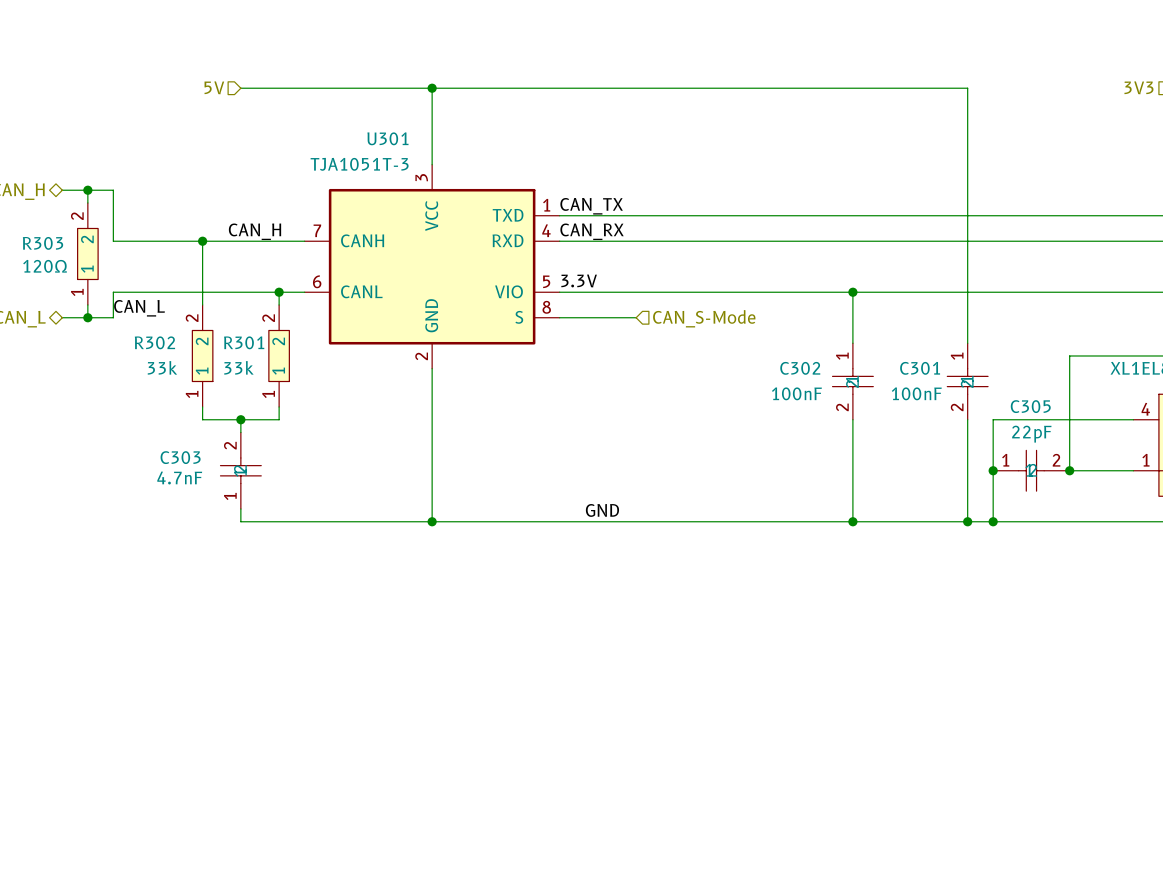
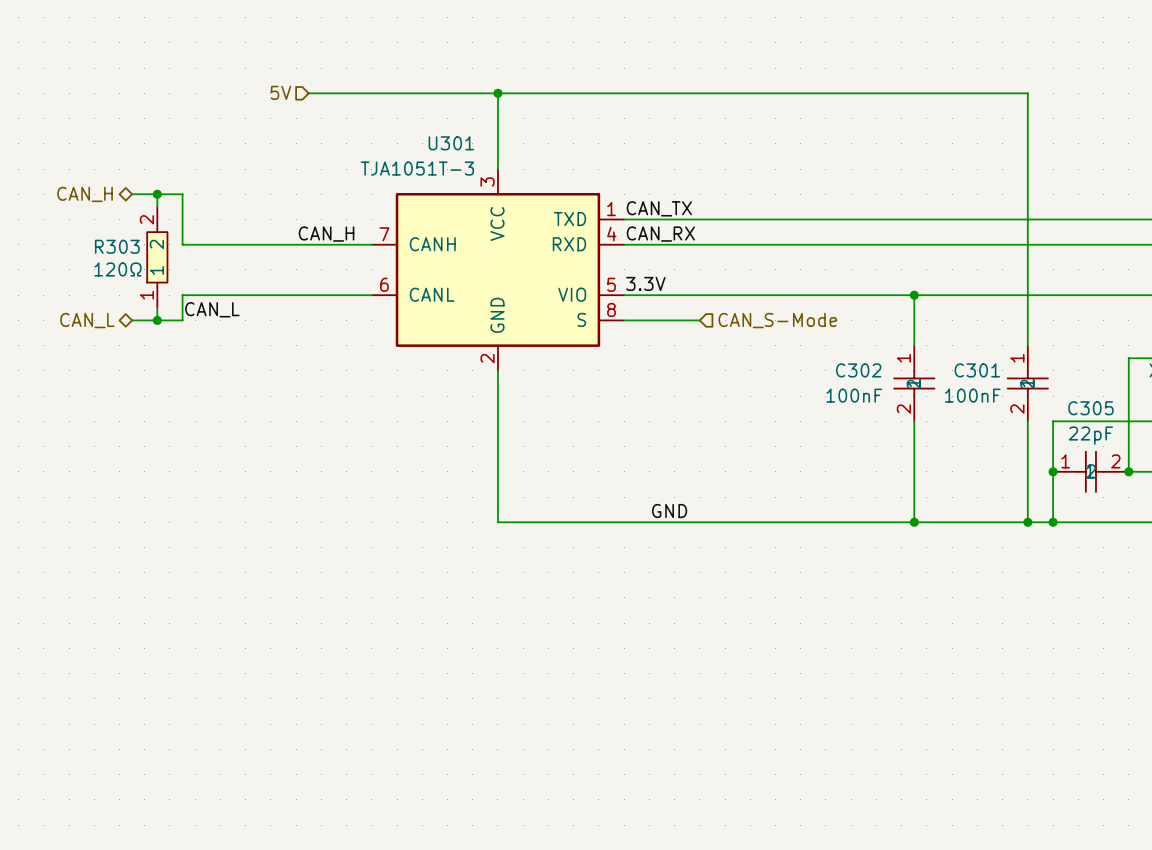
wire: (202, 241) (202, 304) -> none
junction: (202, 241) -> none
wire: (279, 292) (279, 304) -> none
junction: (279, 292) -> none
R302: 33k (202, 355) -> none
R301: 33k (279, 355) -> none
wire: (202, 407) (202, 419) (279, 419) (279, 407) -> none
wire: (240, 419) (240, 432) -> none
junction: (240, 419) -> none
C303: 4.7nF (240, 470) -> none
wire: (240, 509) (240, 521) (432, 521) -> none
junction: (432, 521) -> none

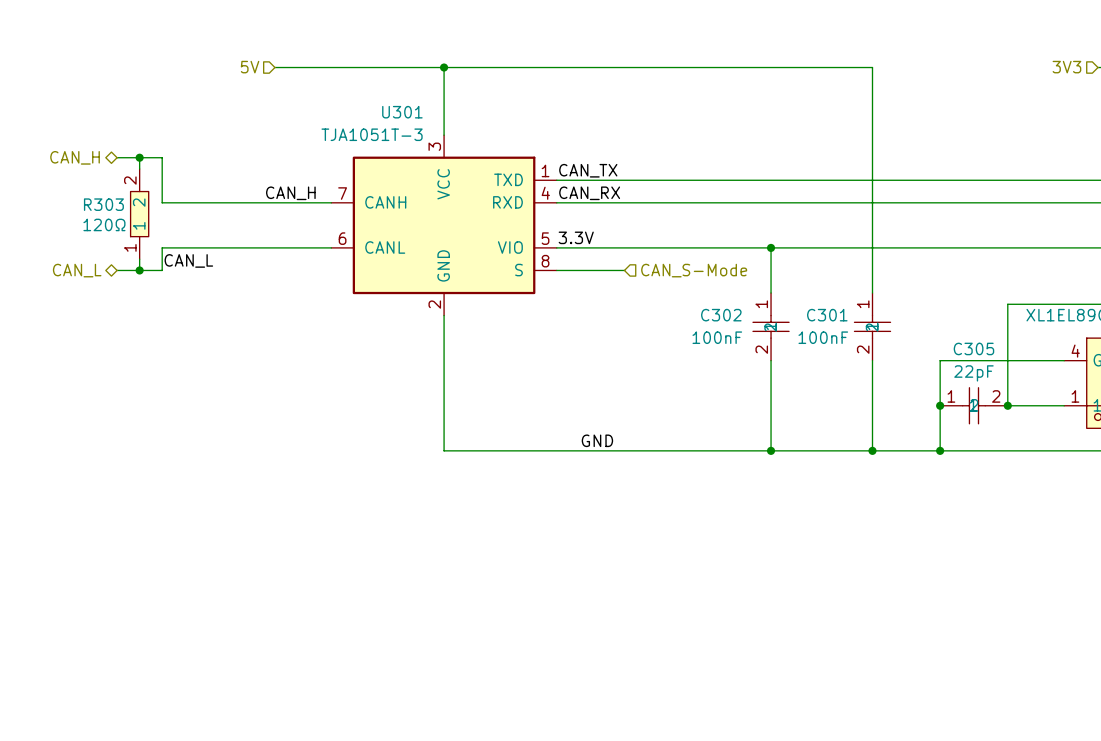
wire: (977, 93) (1027, 93) (1027, 345) -> (872, 67) (872, 293)
wire: (914, 295) (914, 345) -> (771, 247) (771, 293)
junction position: (914, 295) -> (771, 247)
C302 position: (914, 383) -> (771, 326)
C301 position: (1027, 383) -> (872, 326)
wire: (914, 421) (914, 522) -> (771, 360) (771, 450)
wire: (1027, 421) (1027, 522) -> (872, 360) (872, 450)
junction: none -> (771, 450)
junction: (914, 522) -> none
junction: none -> (872, 450)
junction: (1027, 522) -> none

